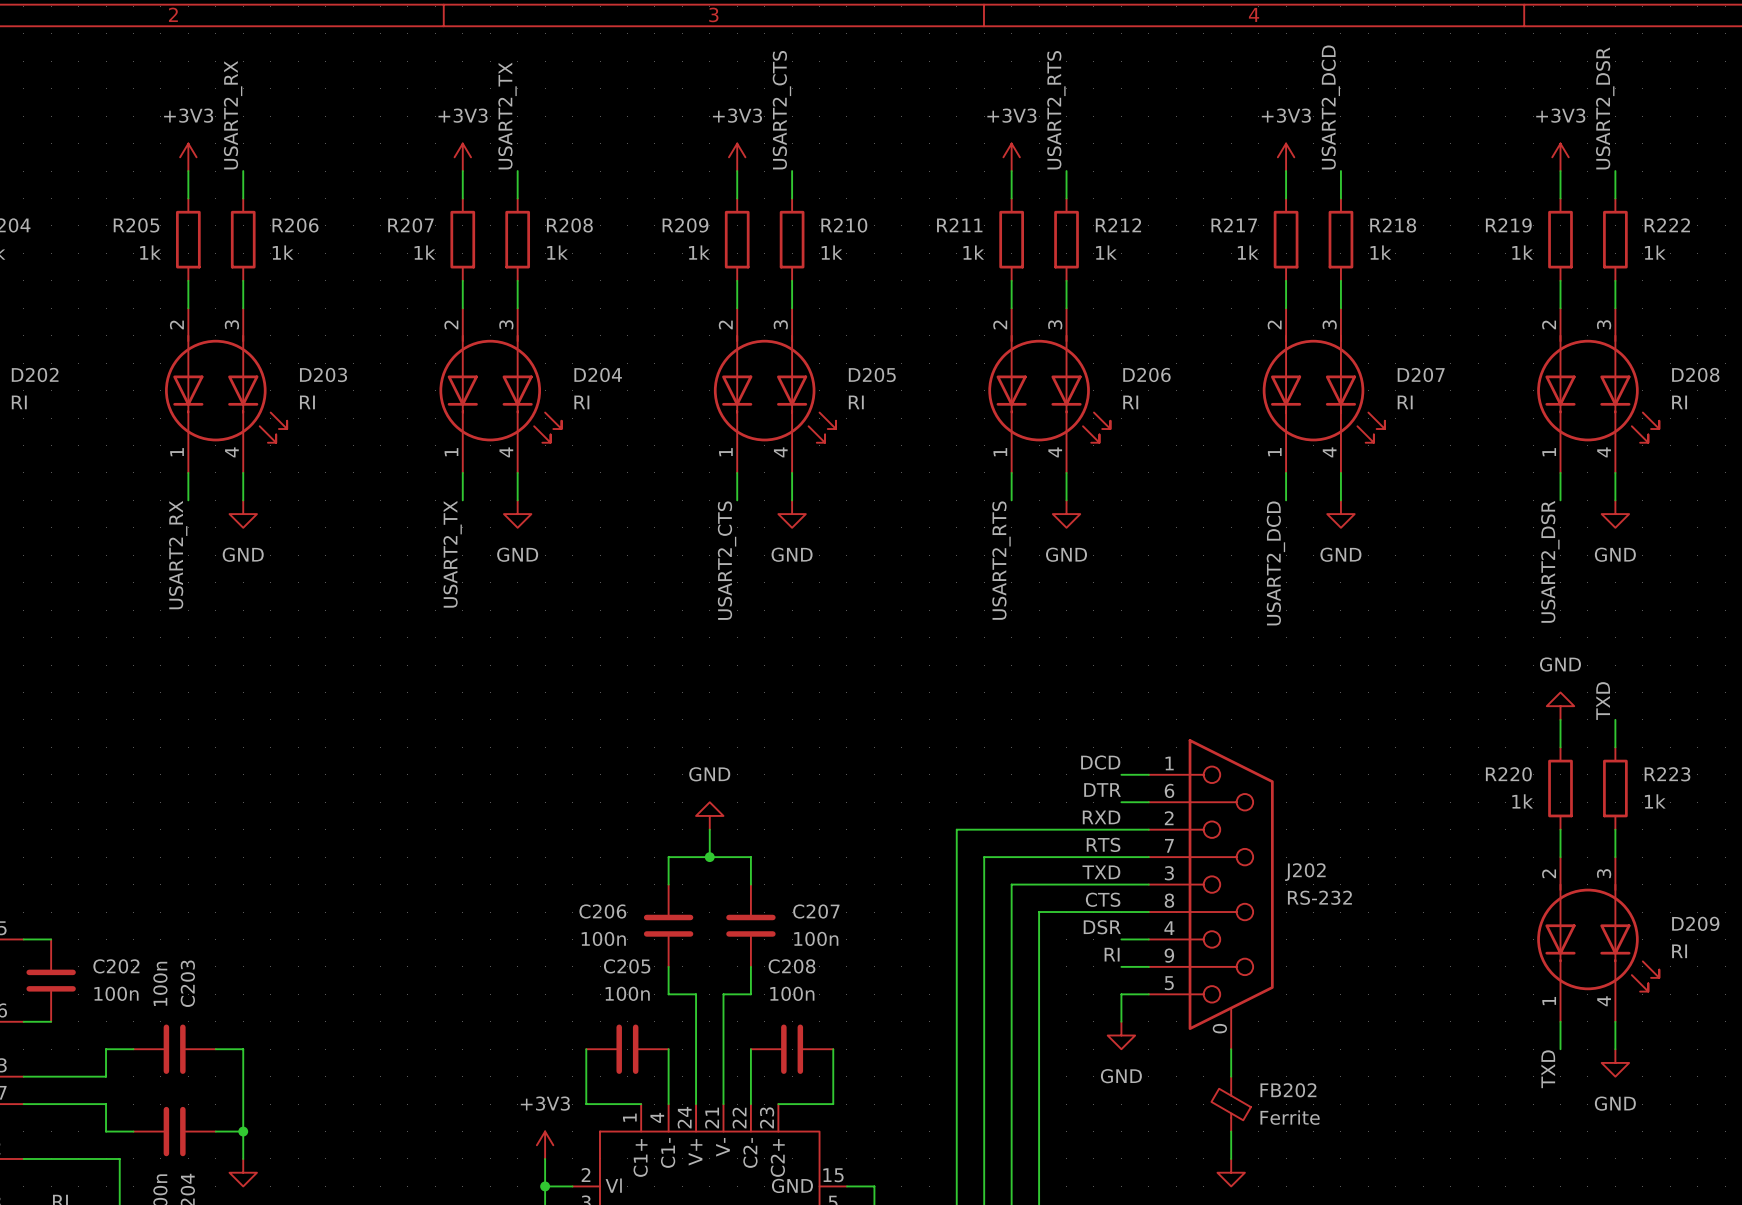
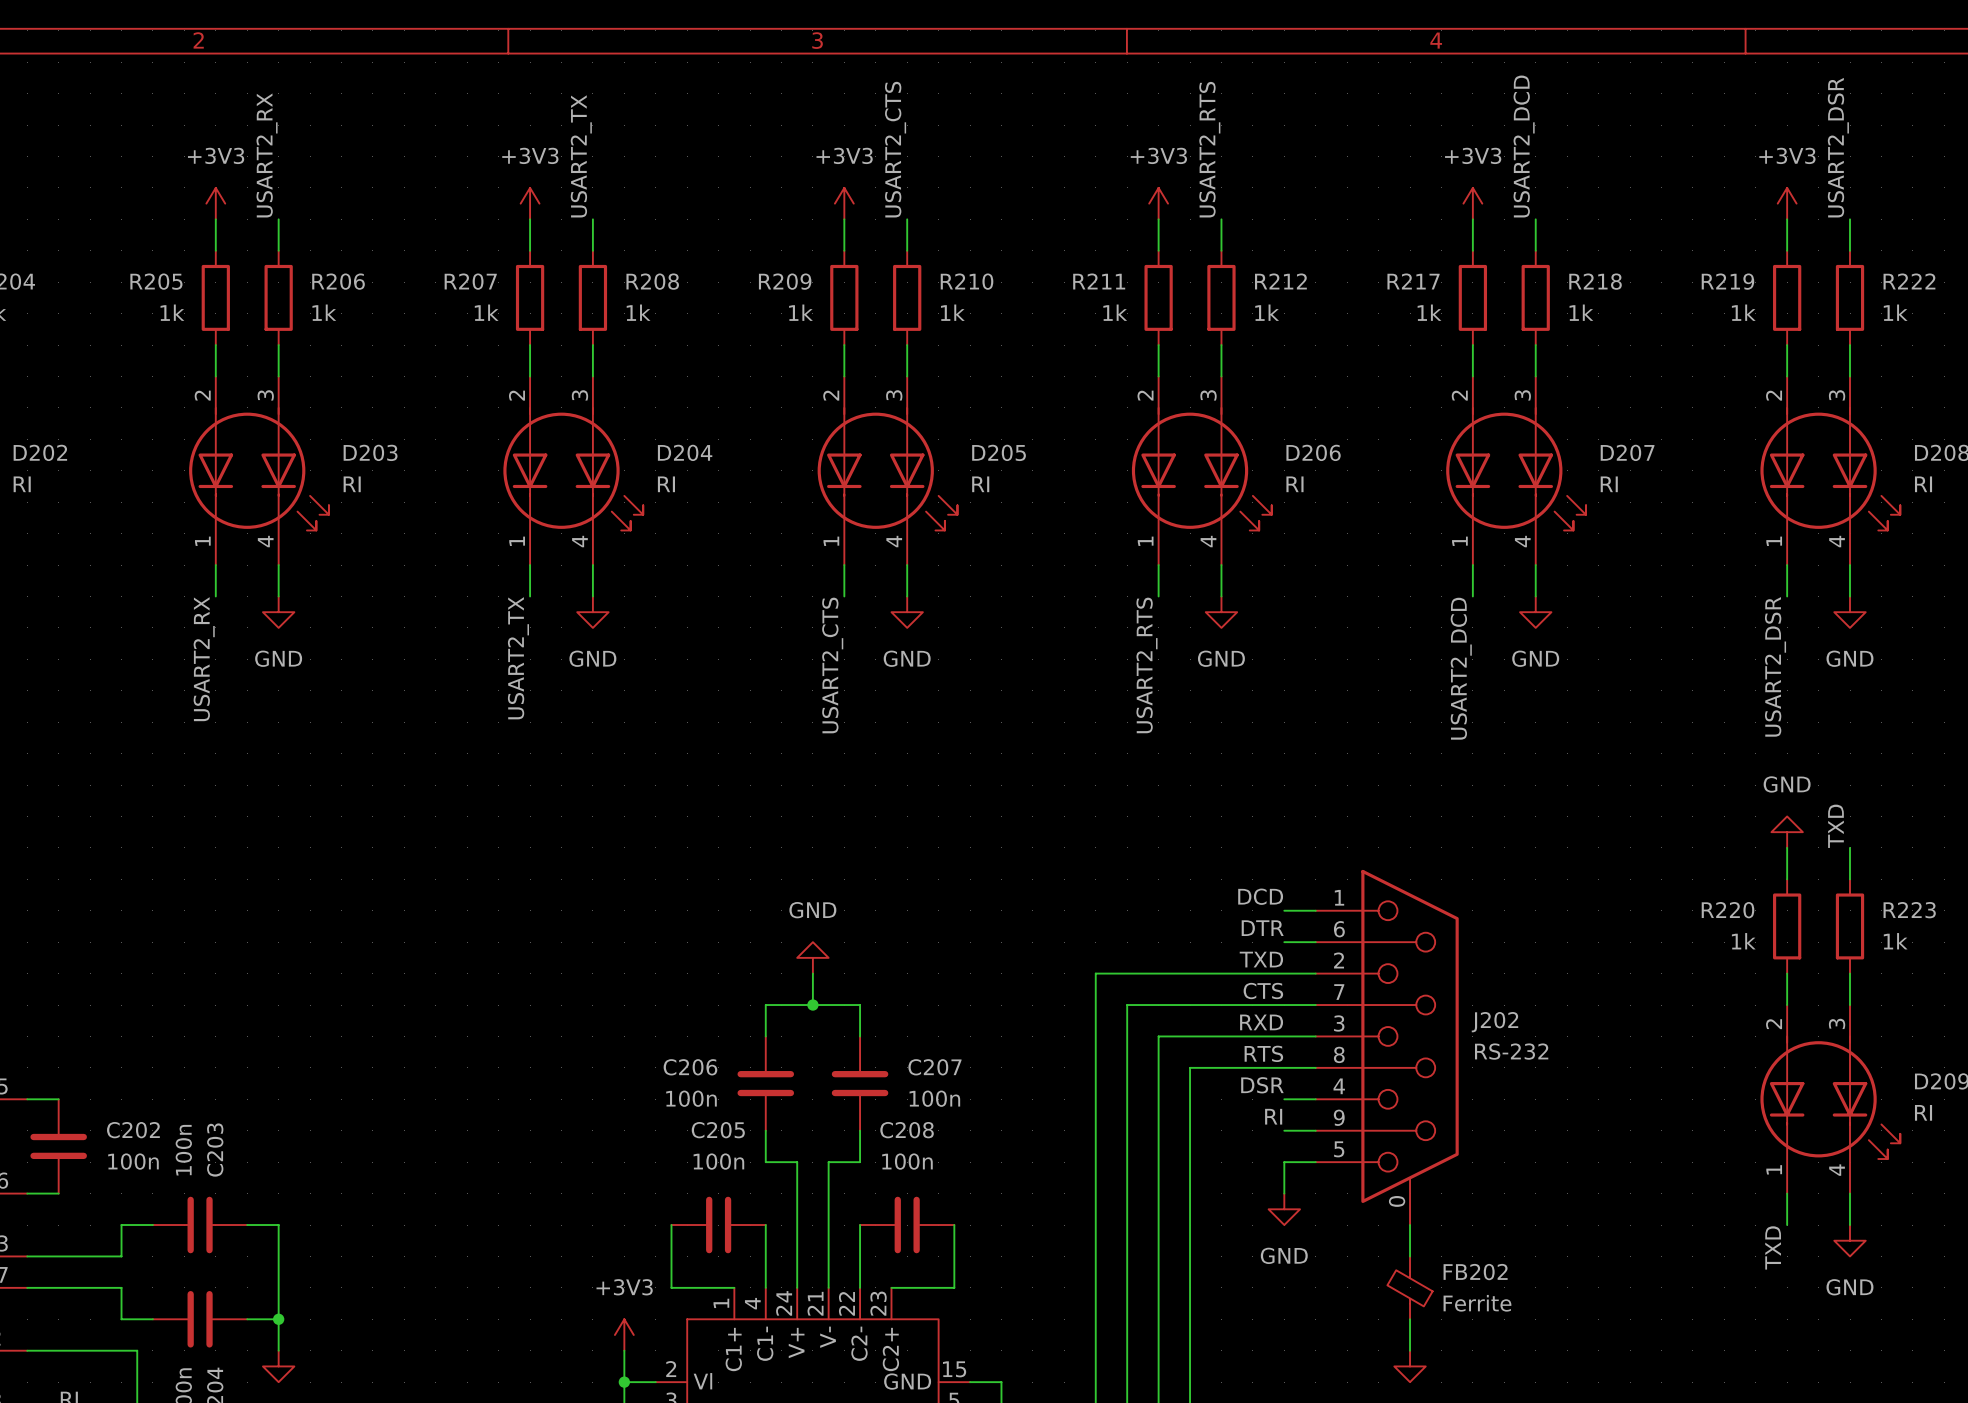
label: RXD (1101, 817) -> TXD (1261, 959)
label: RTS (1103, 844) -> CTS (1263, 991)
label: TXD (1101, 872) -> RXD (1261, 1022)
label: CTS (1103, 899) -> RTS (1263, 1053)

